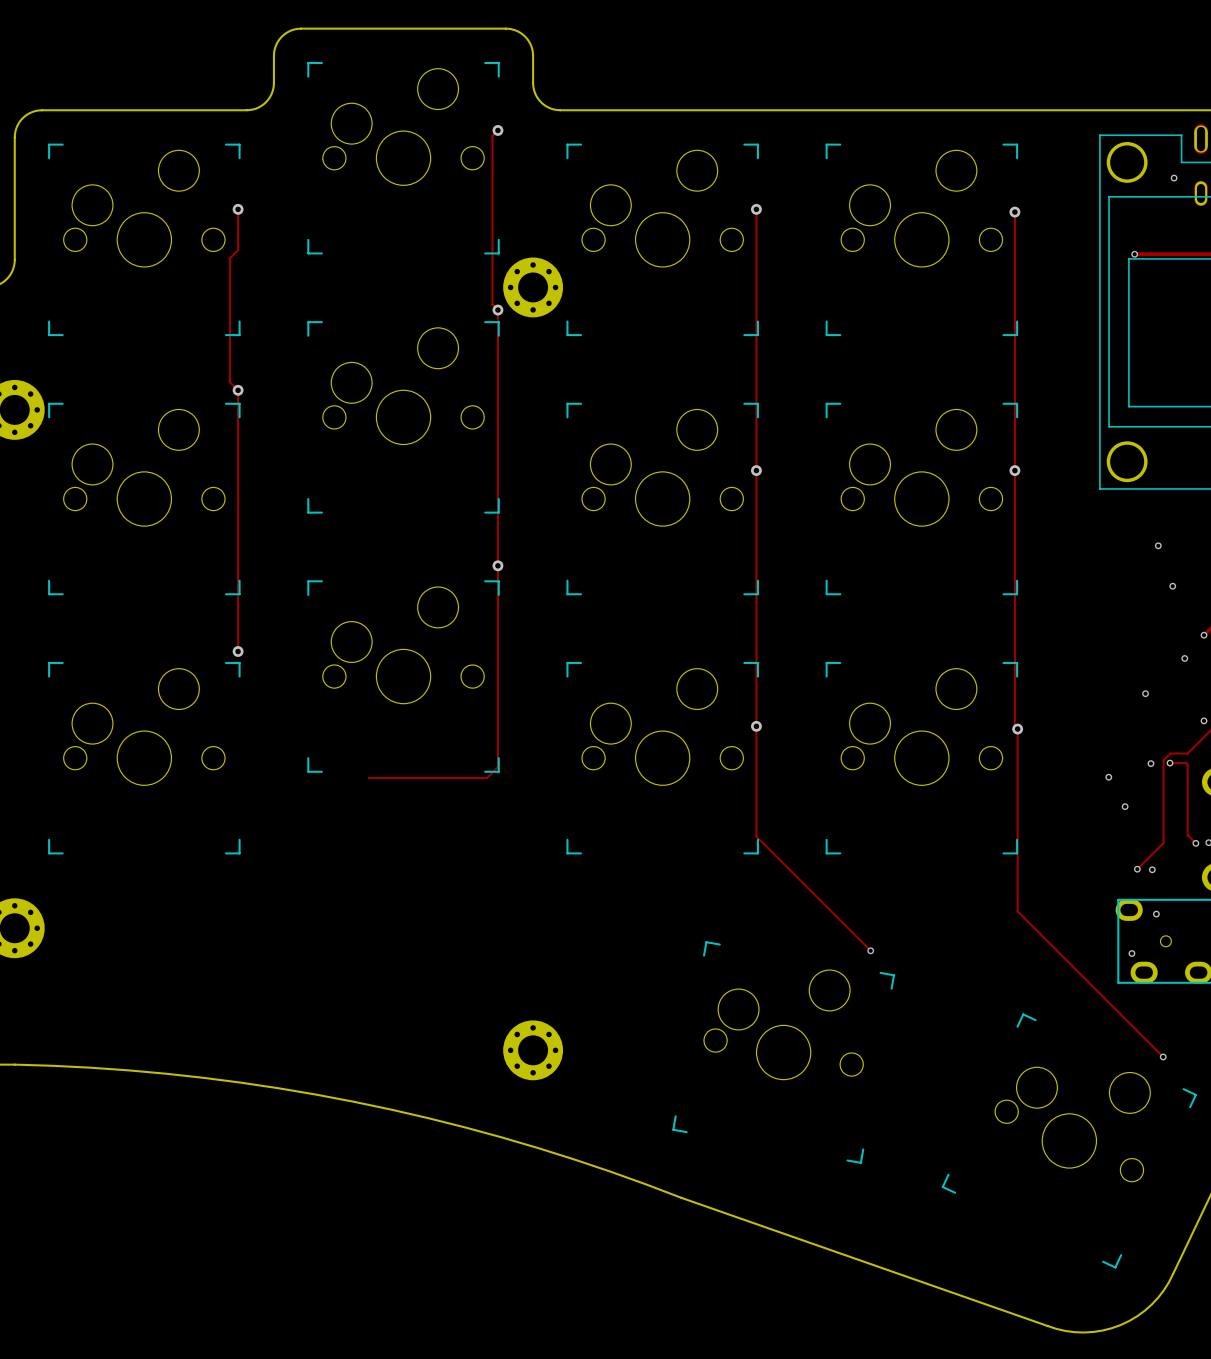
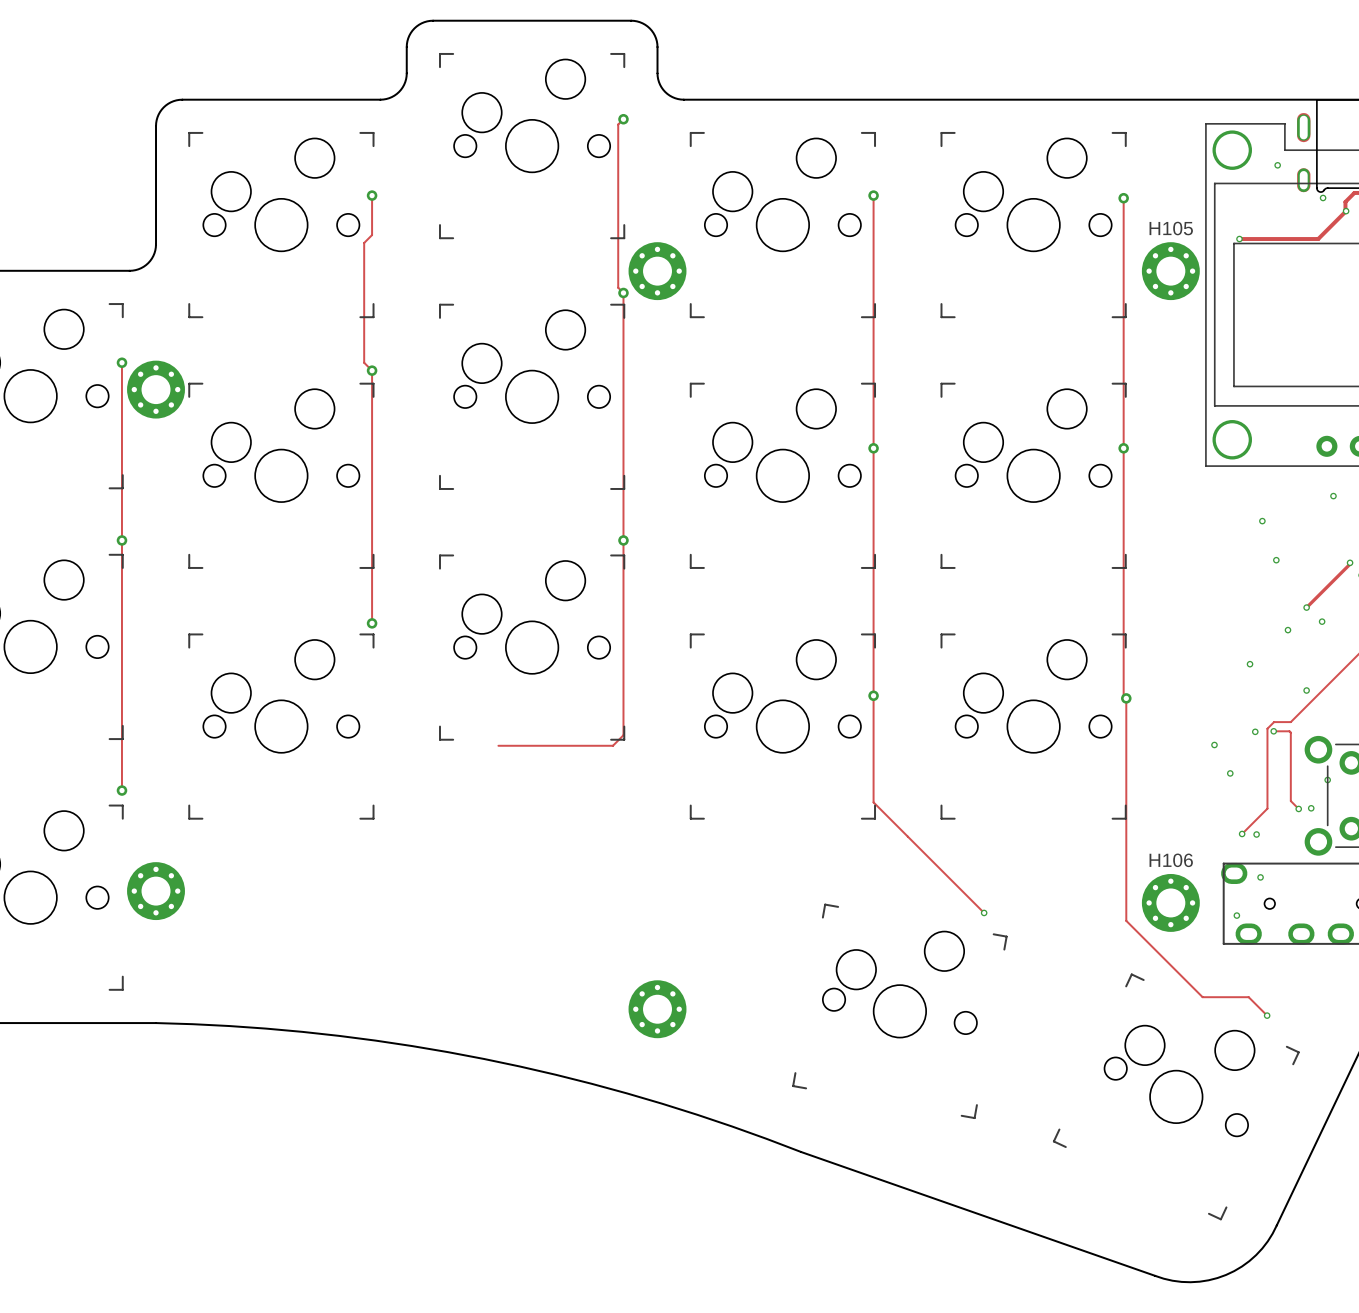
H105: none -> (1170, 271)
track: (1017, 911) (1144, 1037) -> (1126, 874) (1126, 920) (1202, 997) (1248, 997)
H106: none -> (1170, 902)

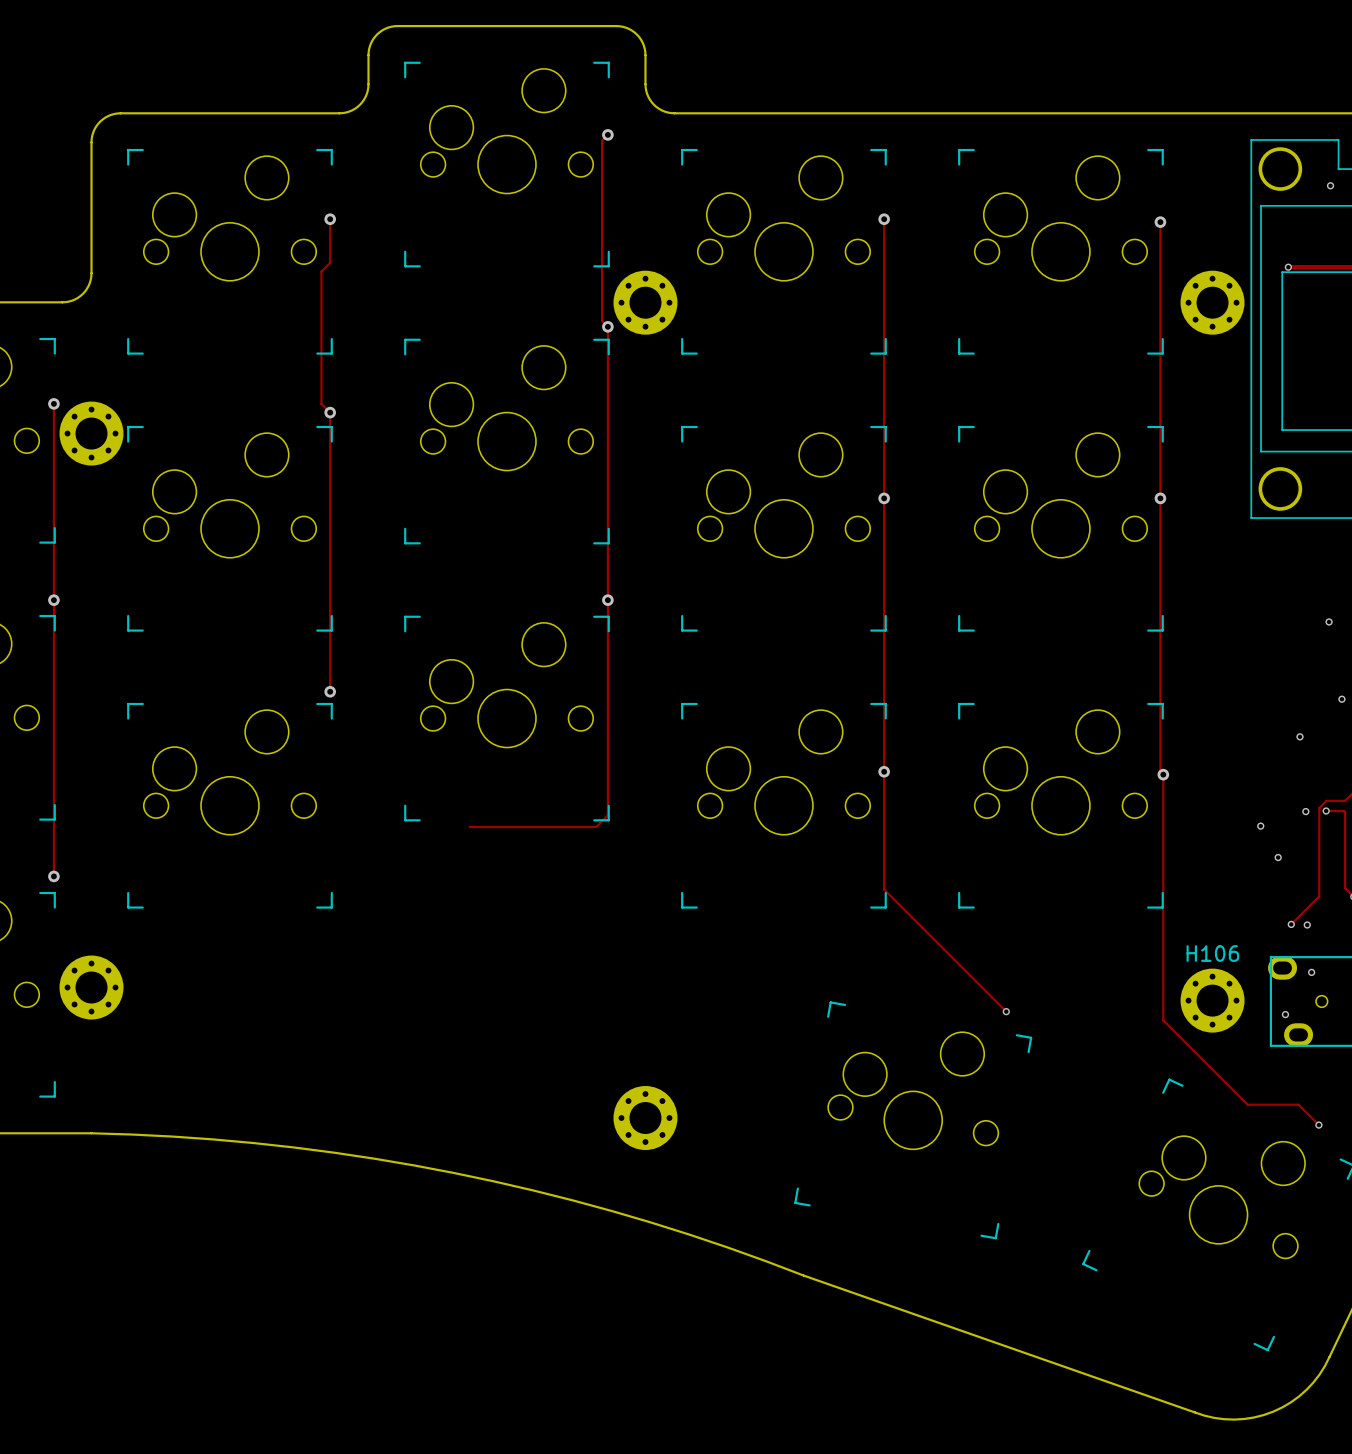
H105 name: H105 (1171, 228) -> none
via: (1262, 521) -> none

